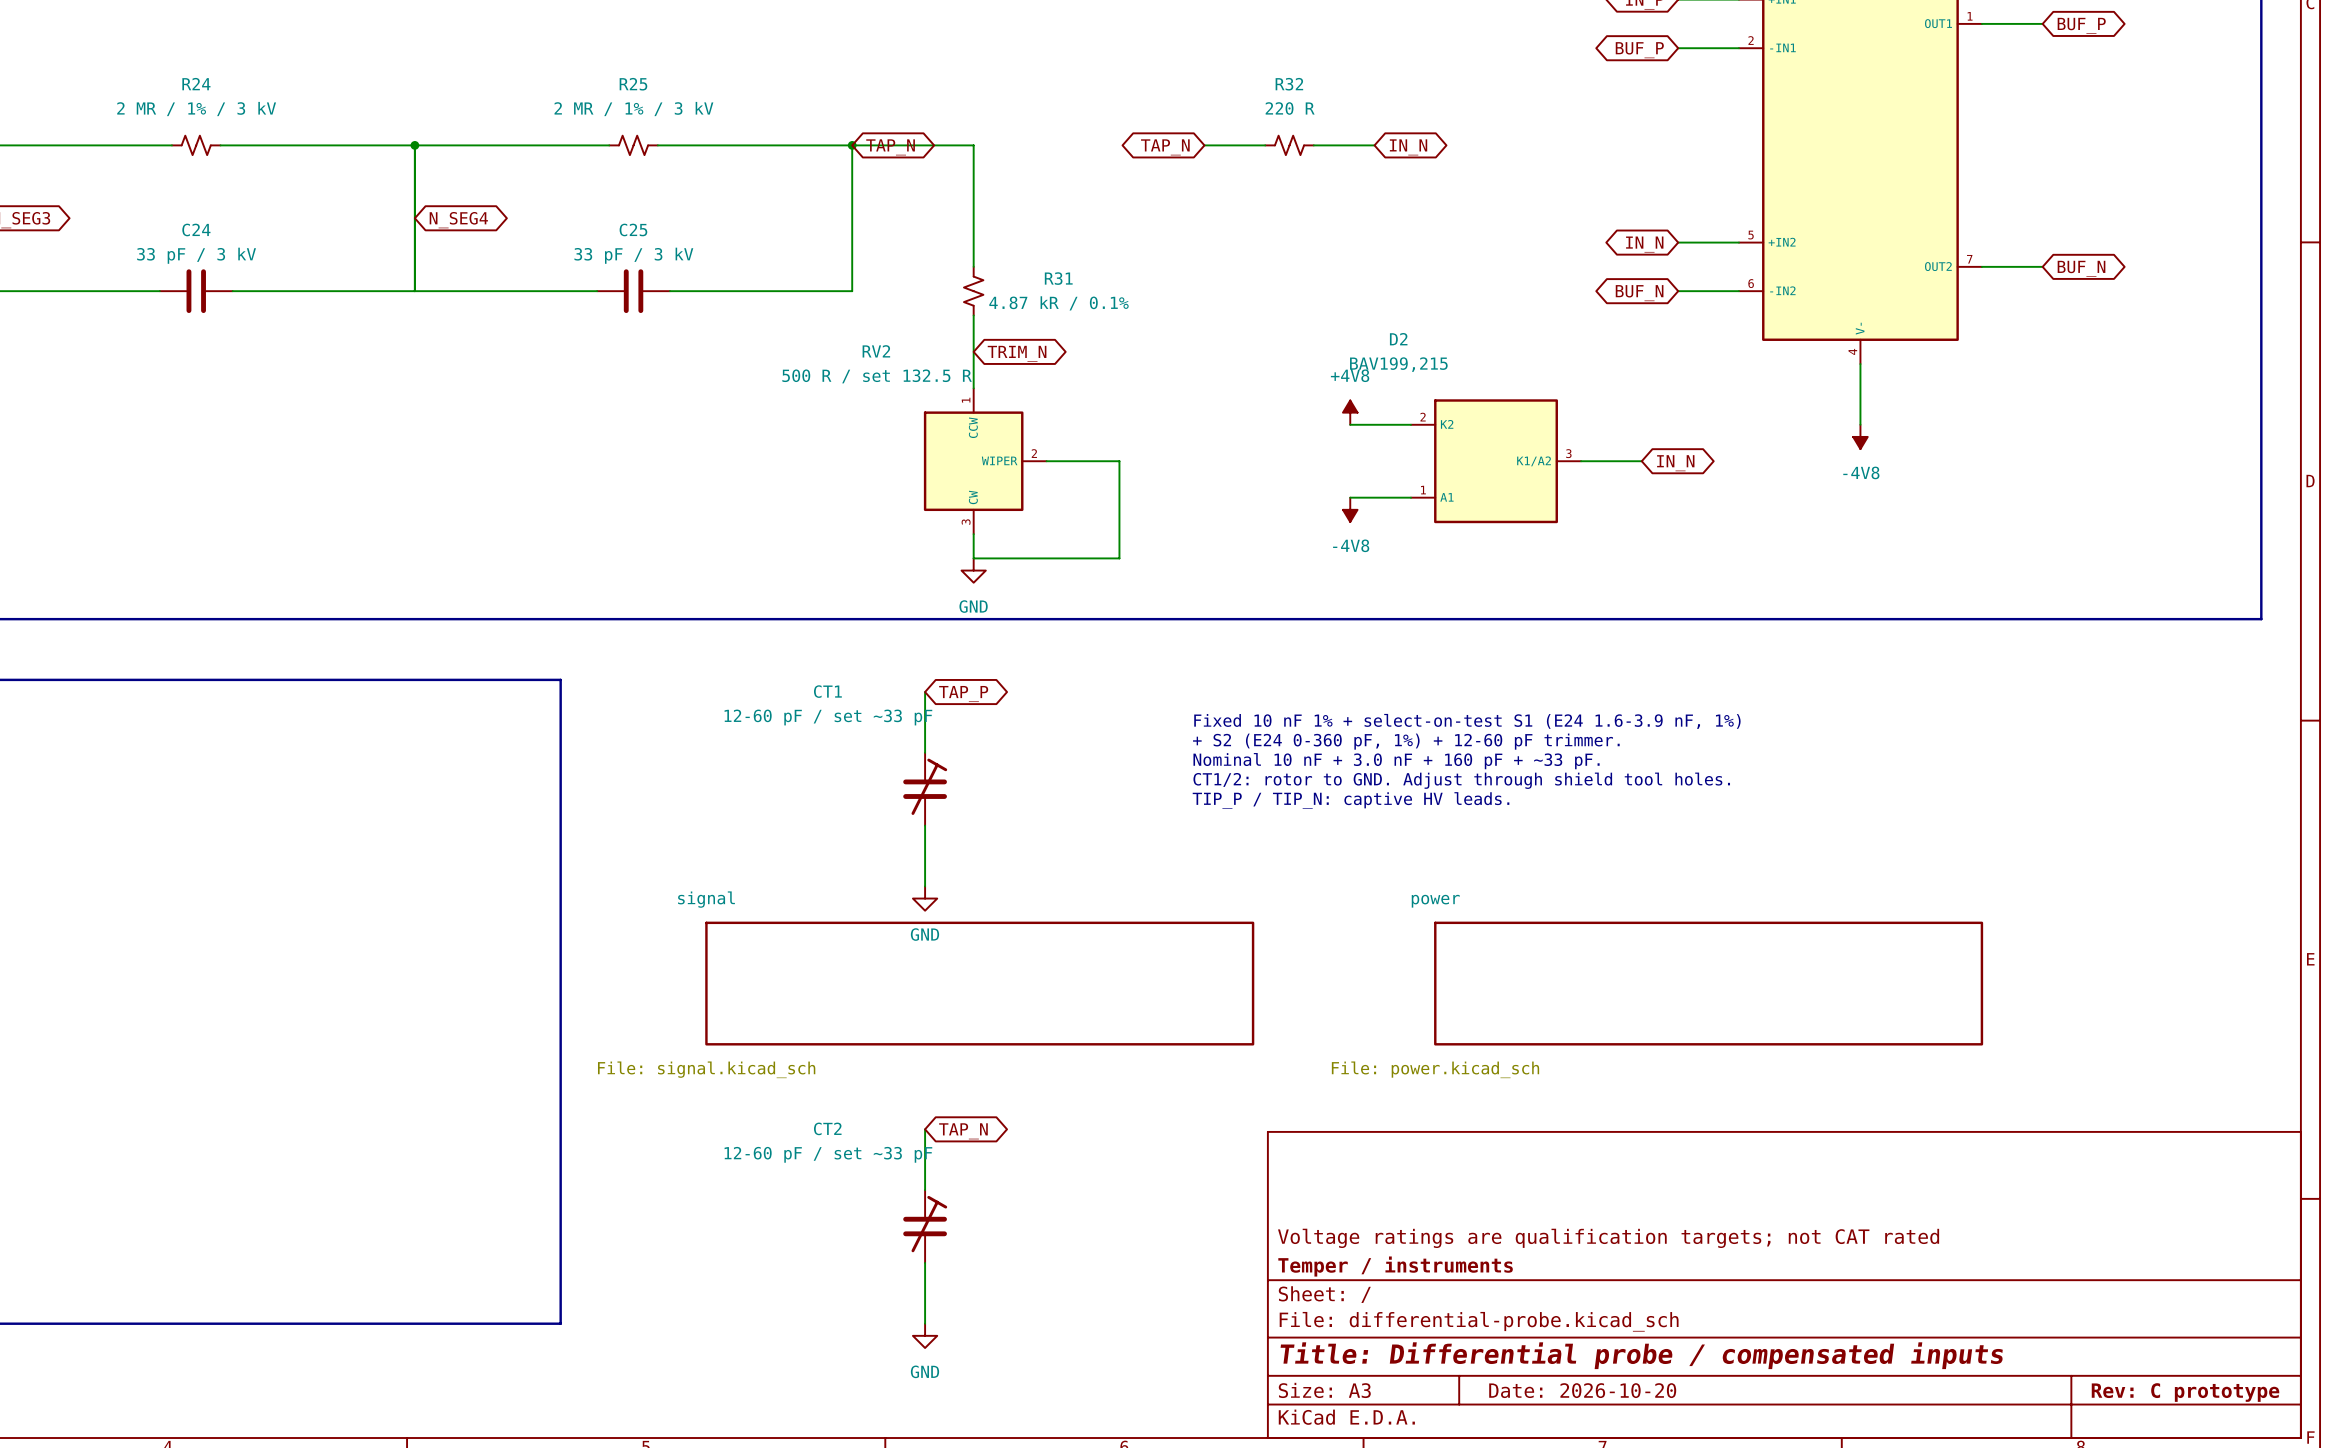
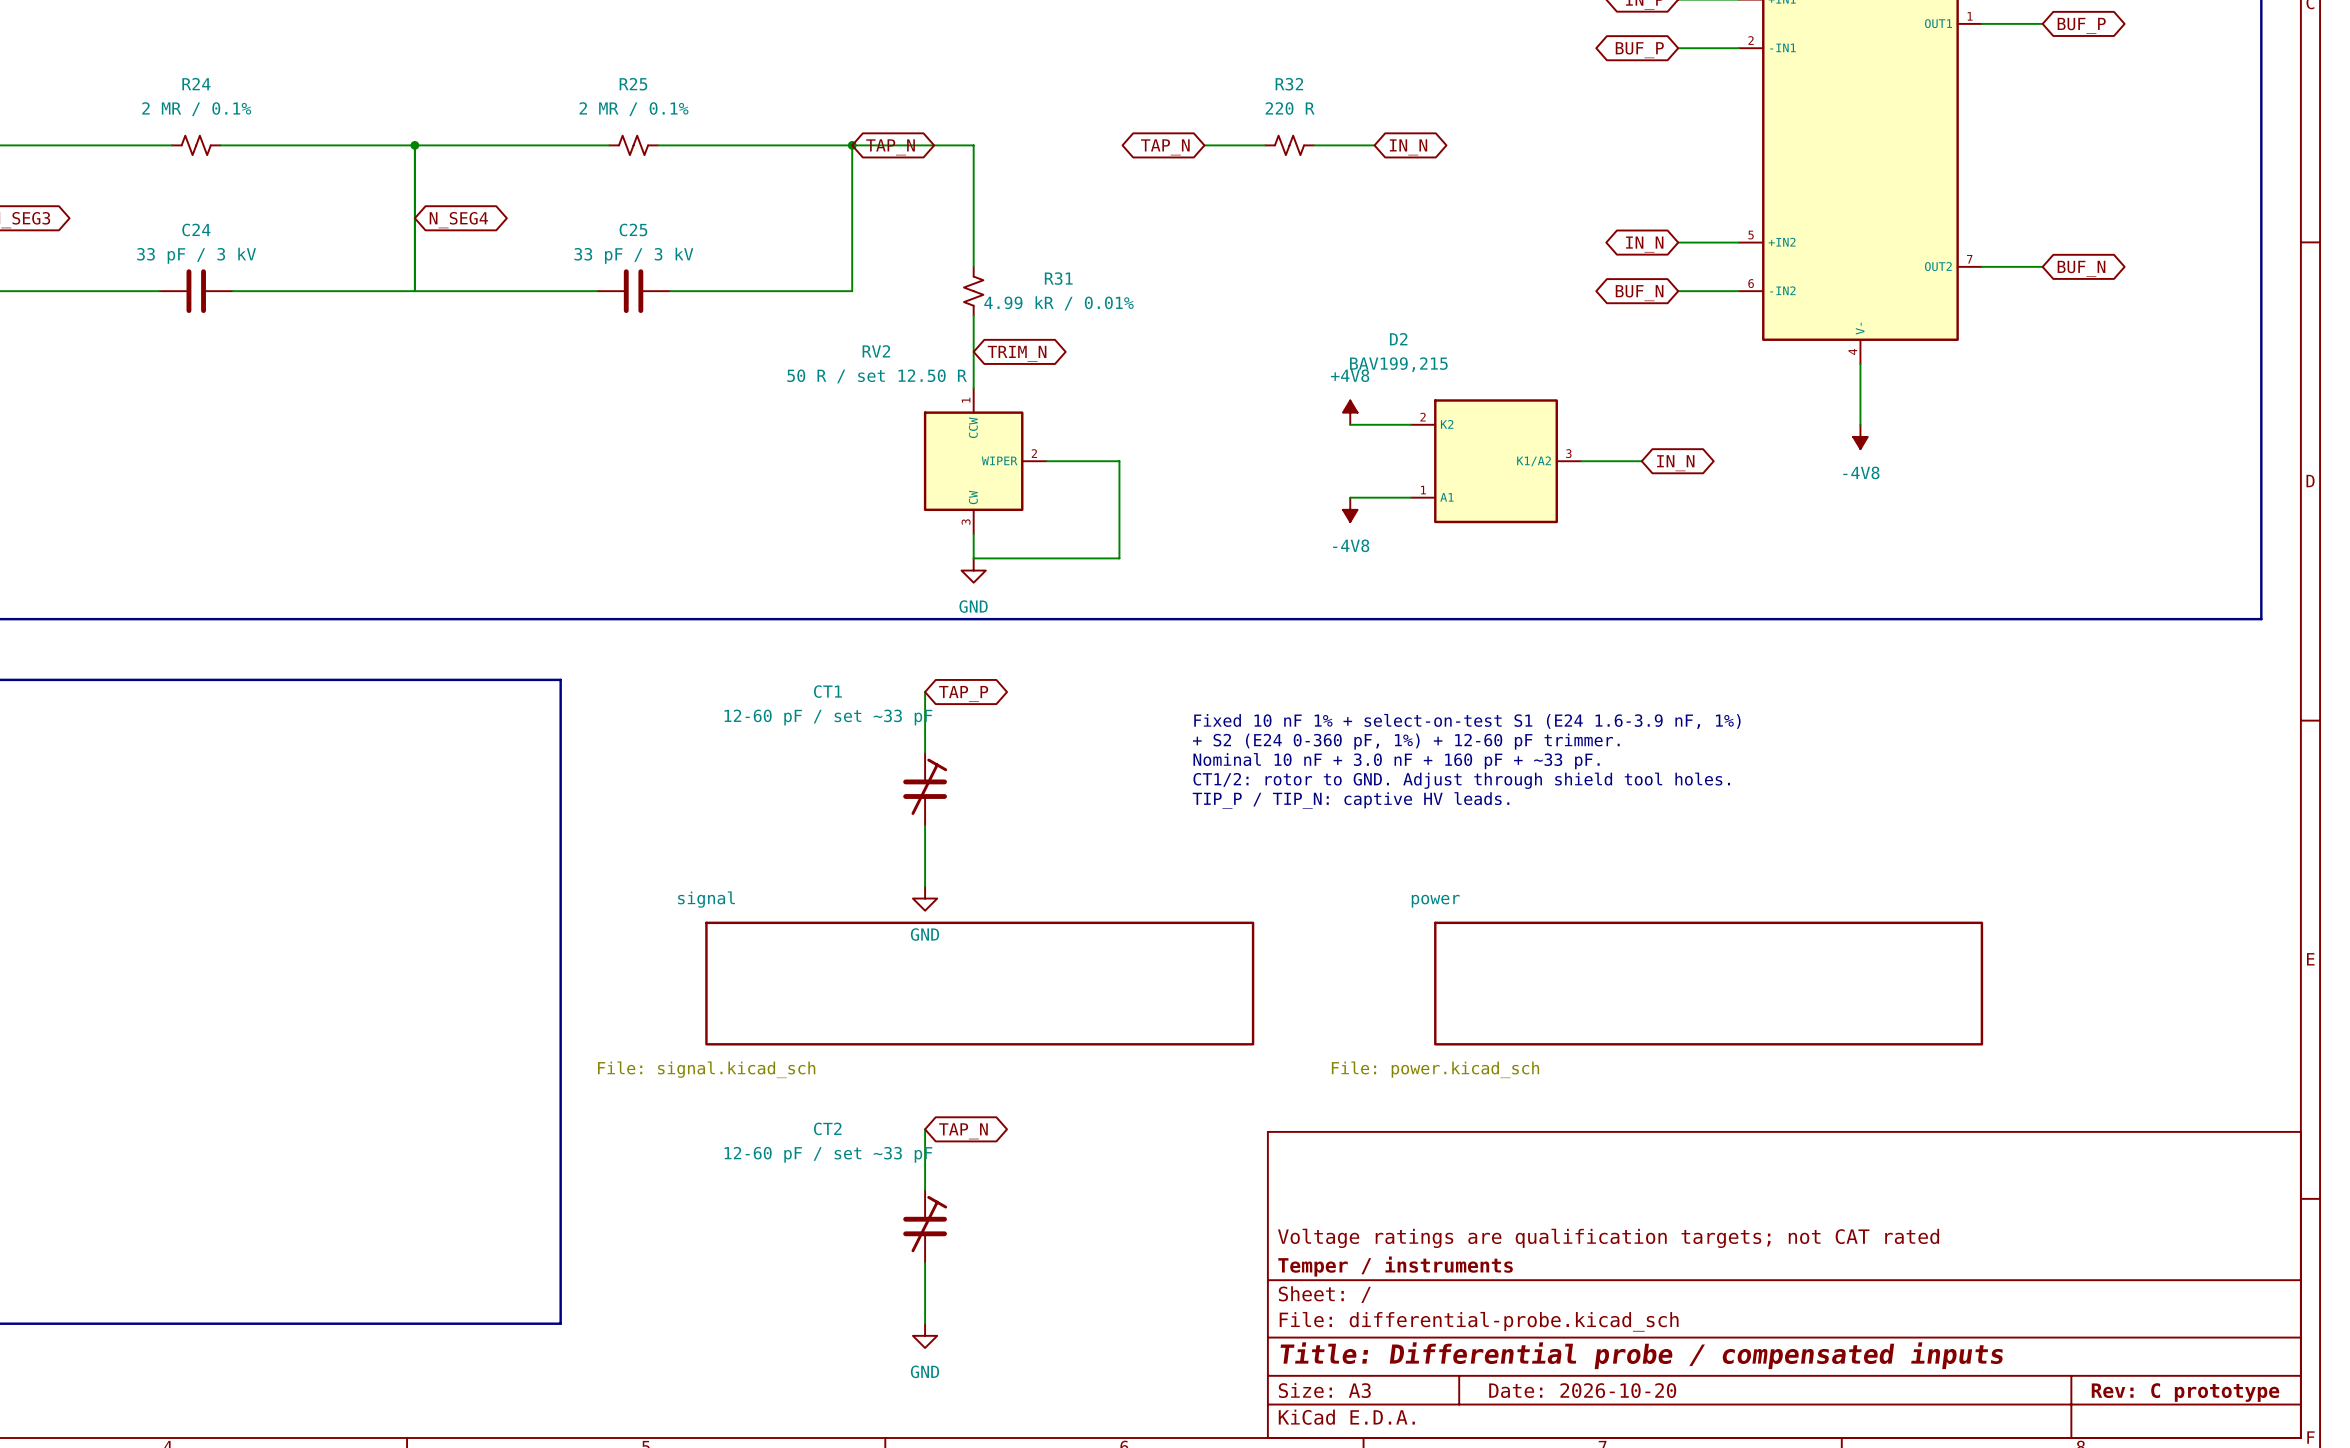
R24 value: 2 MR / 1% / 3 kV (196, 109) -> 2 MR / 0.1% (196, 109)
R25 value: 2 MR / 1% / 3 kV (633, 109) -> 2 MR / 0.1% (634, 109)
R31 value: 4.87 kR / 0.1% (1058, 303) -> 4.99 kR / 0.01% (1058, 303)
RV2 value: 500 R / set 132.5 R (877, 376) -> 50 R / set 12.50 R (877, 376)

